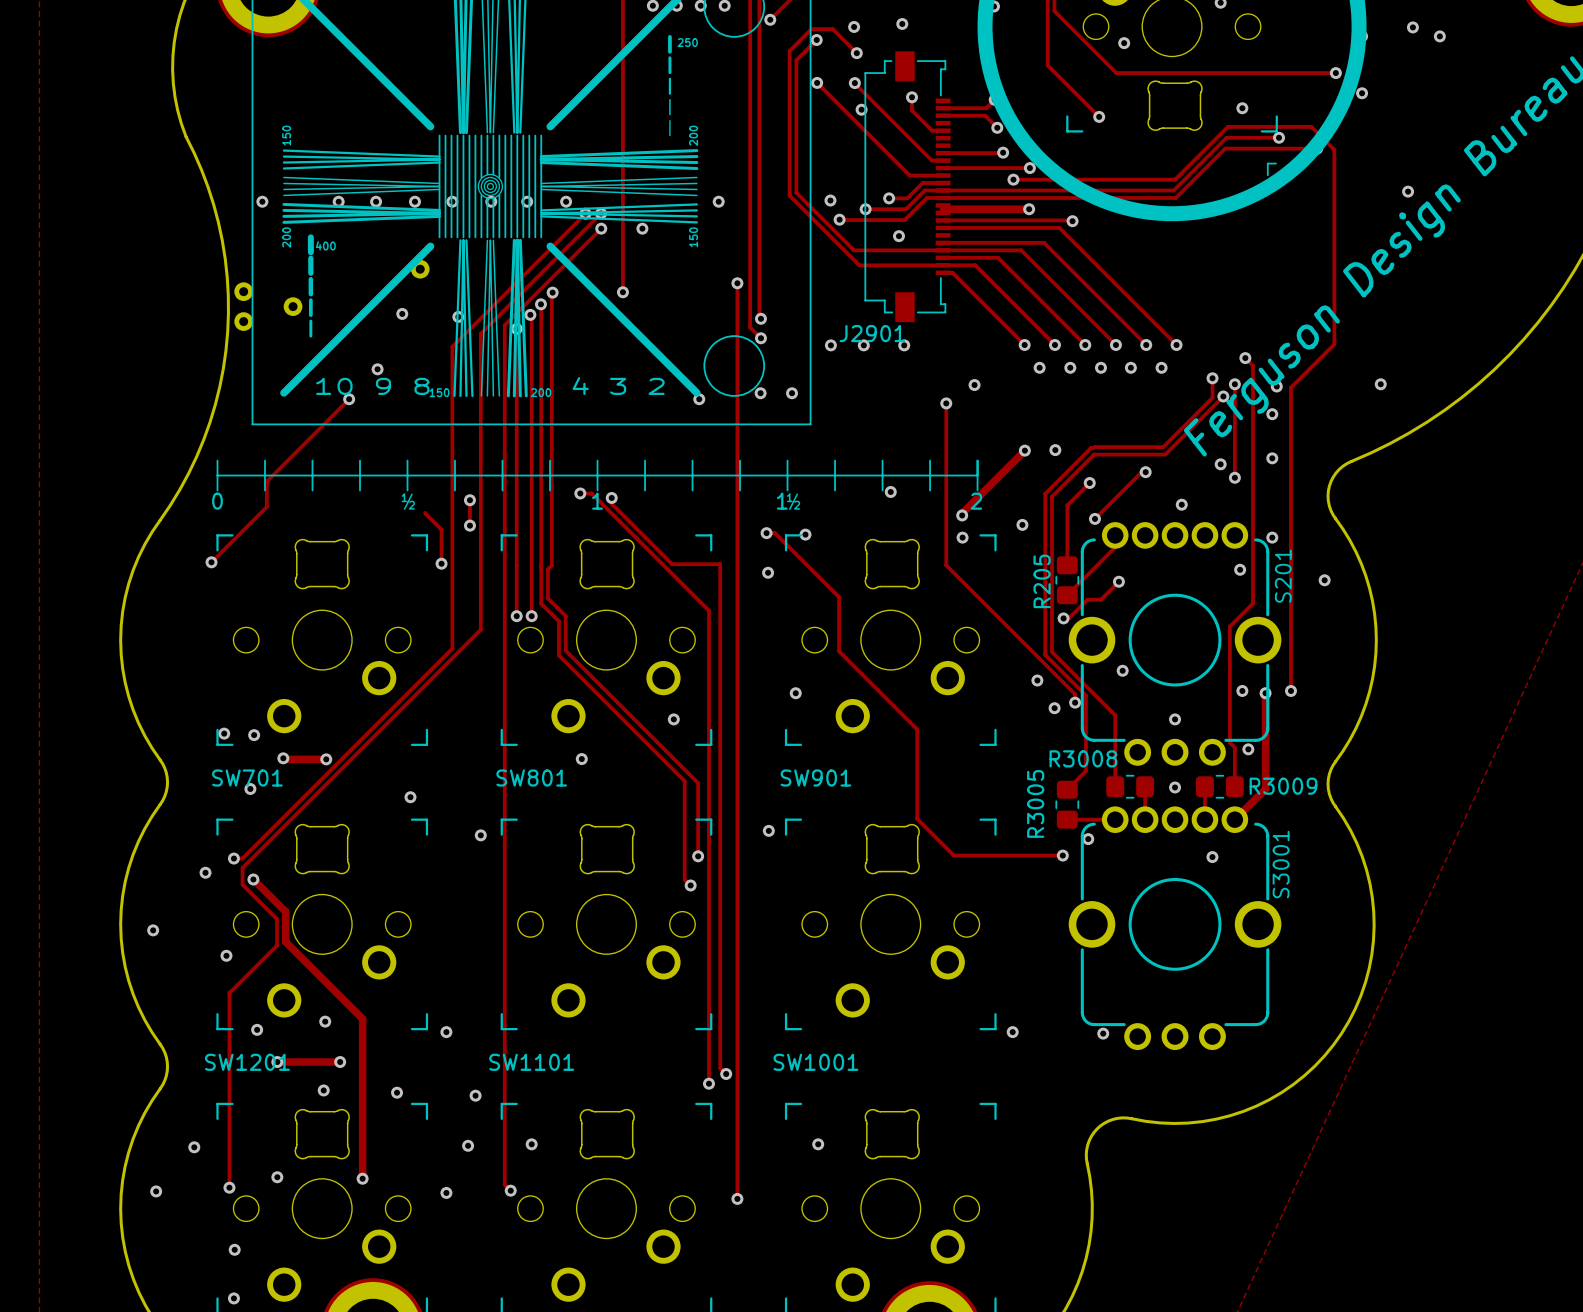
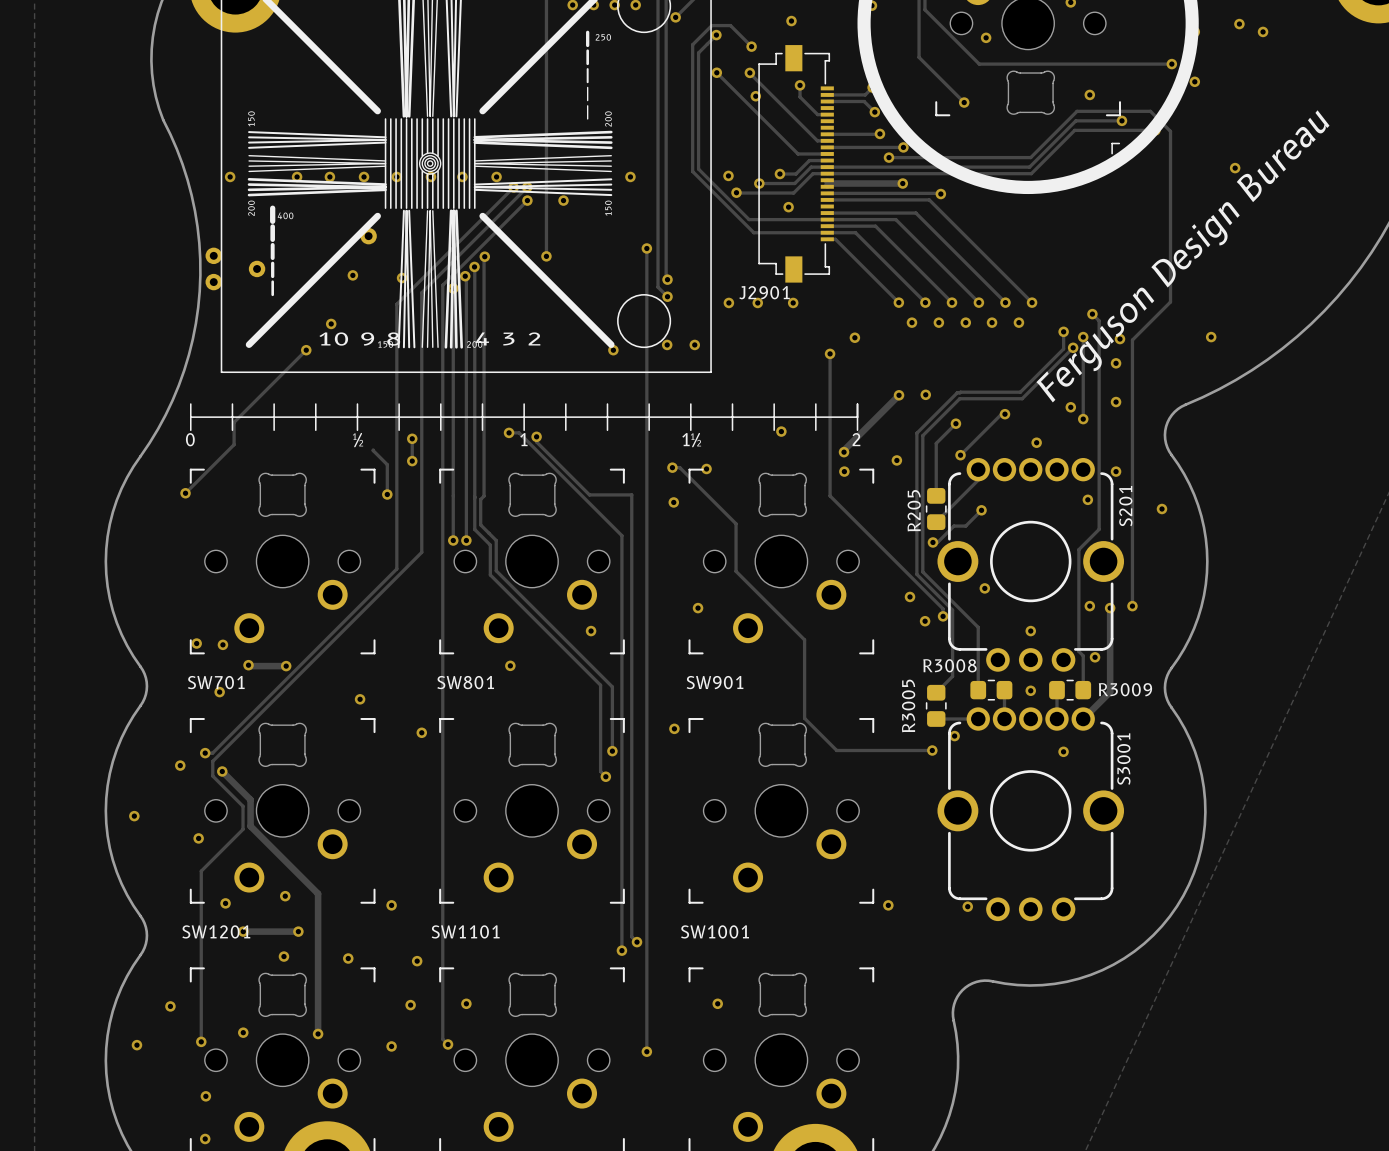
via: (854, 26) -> none

